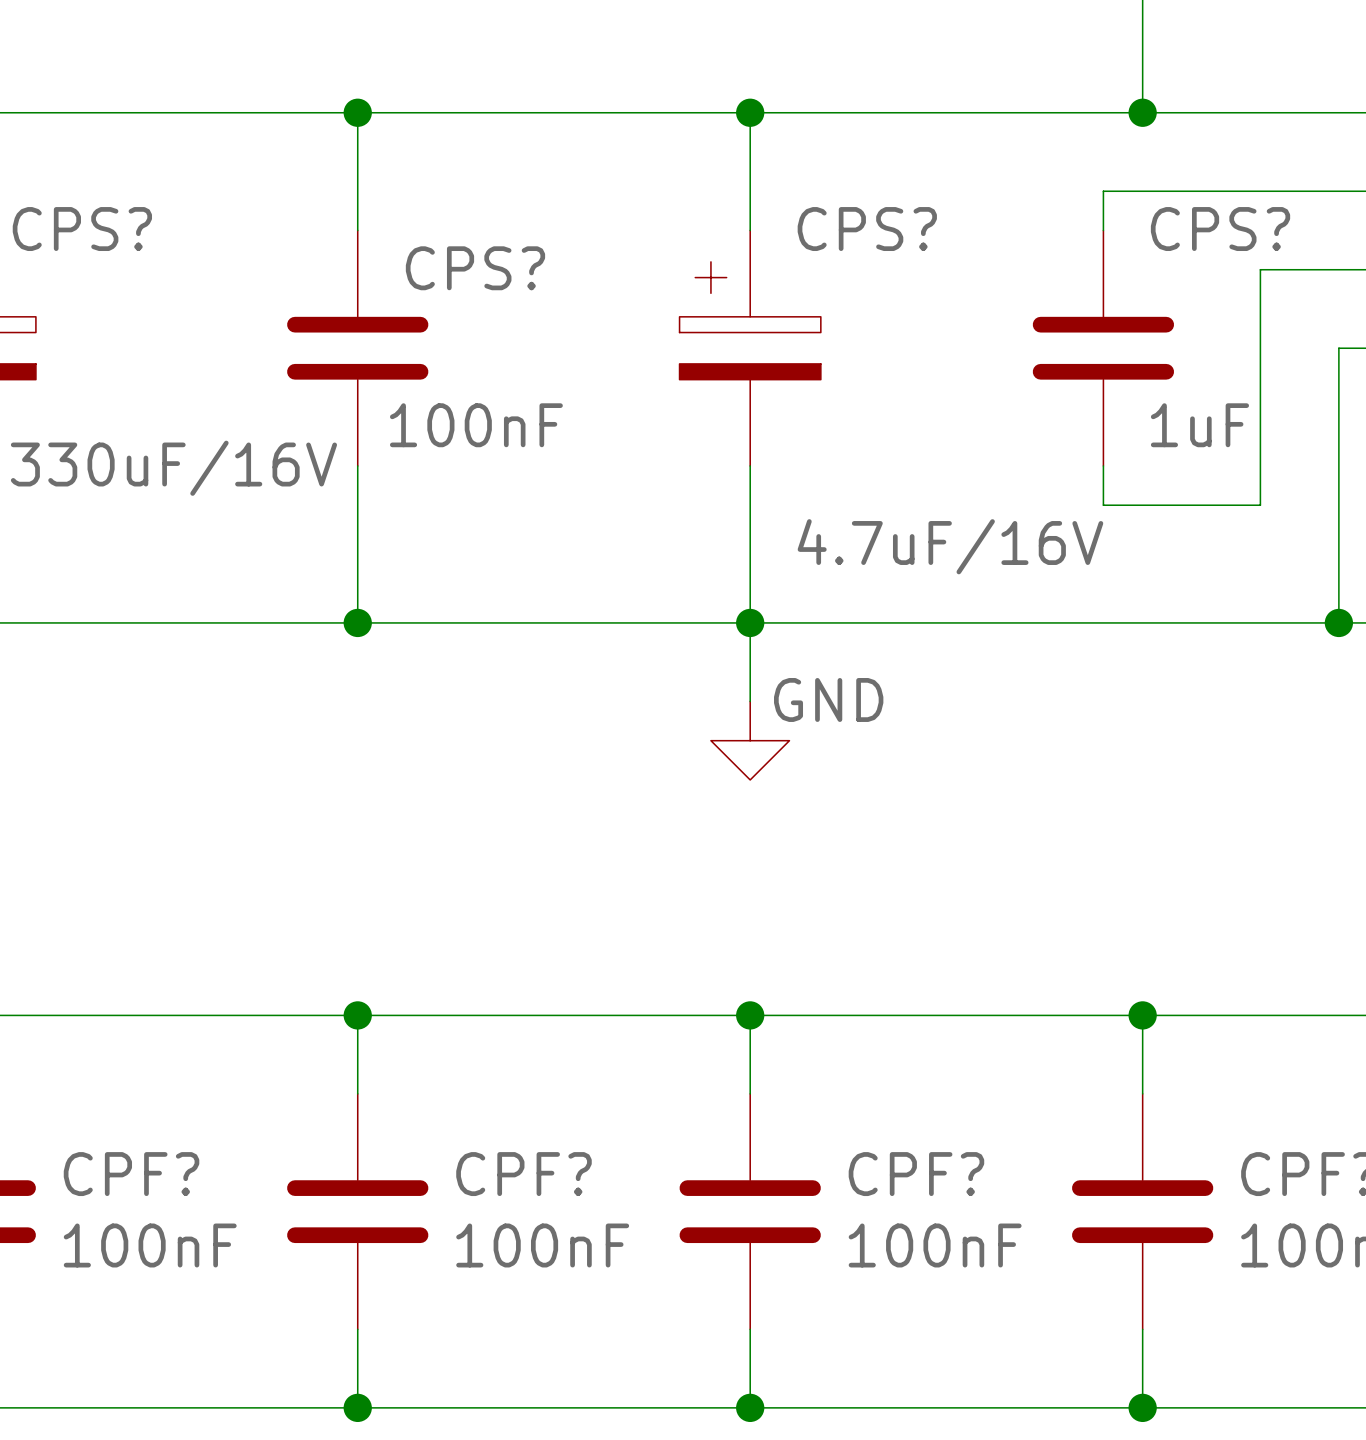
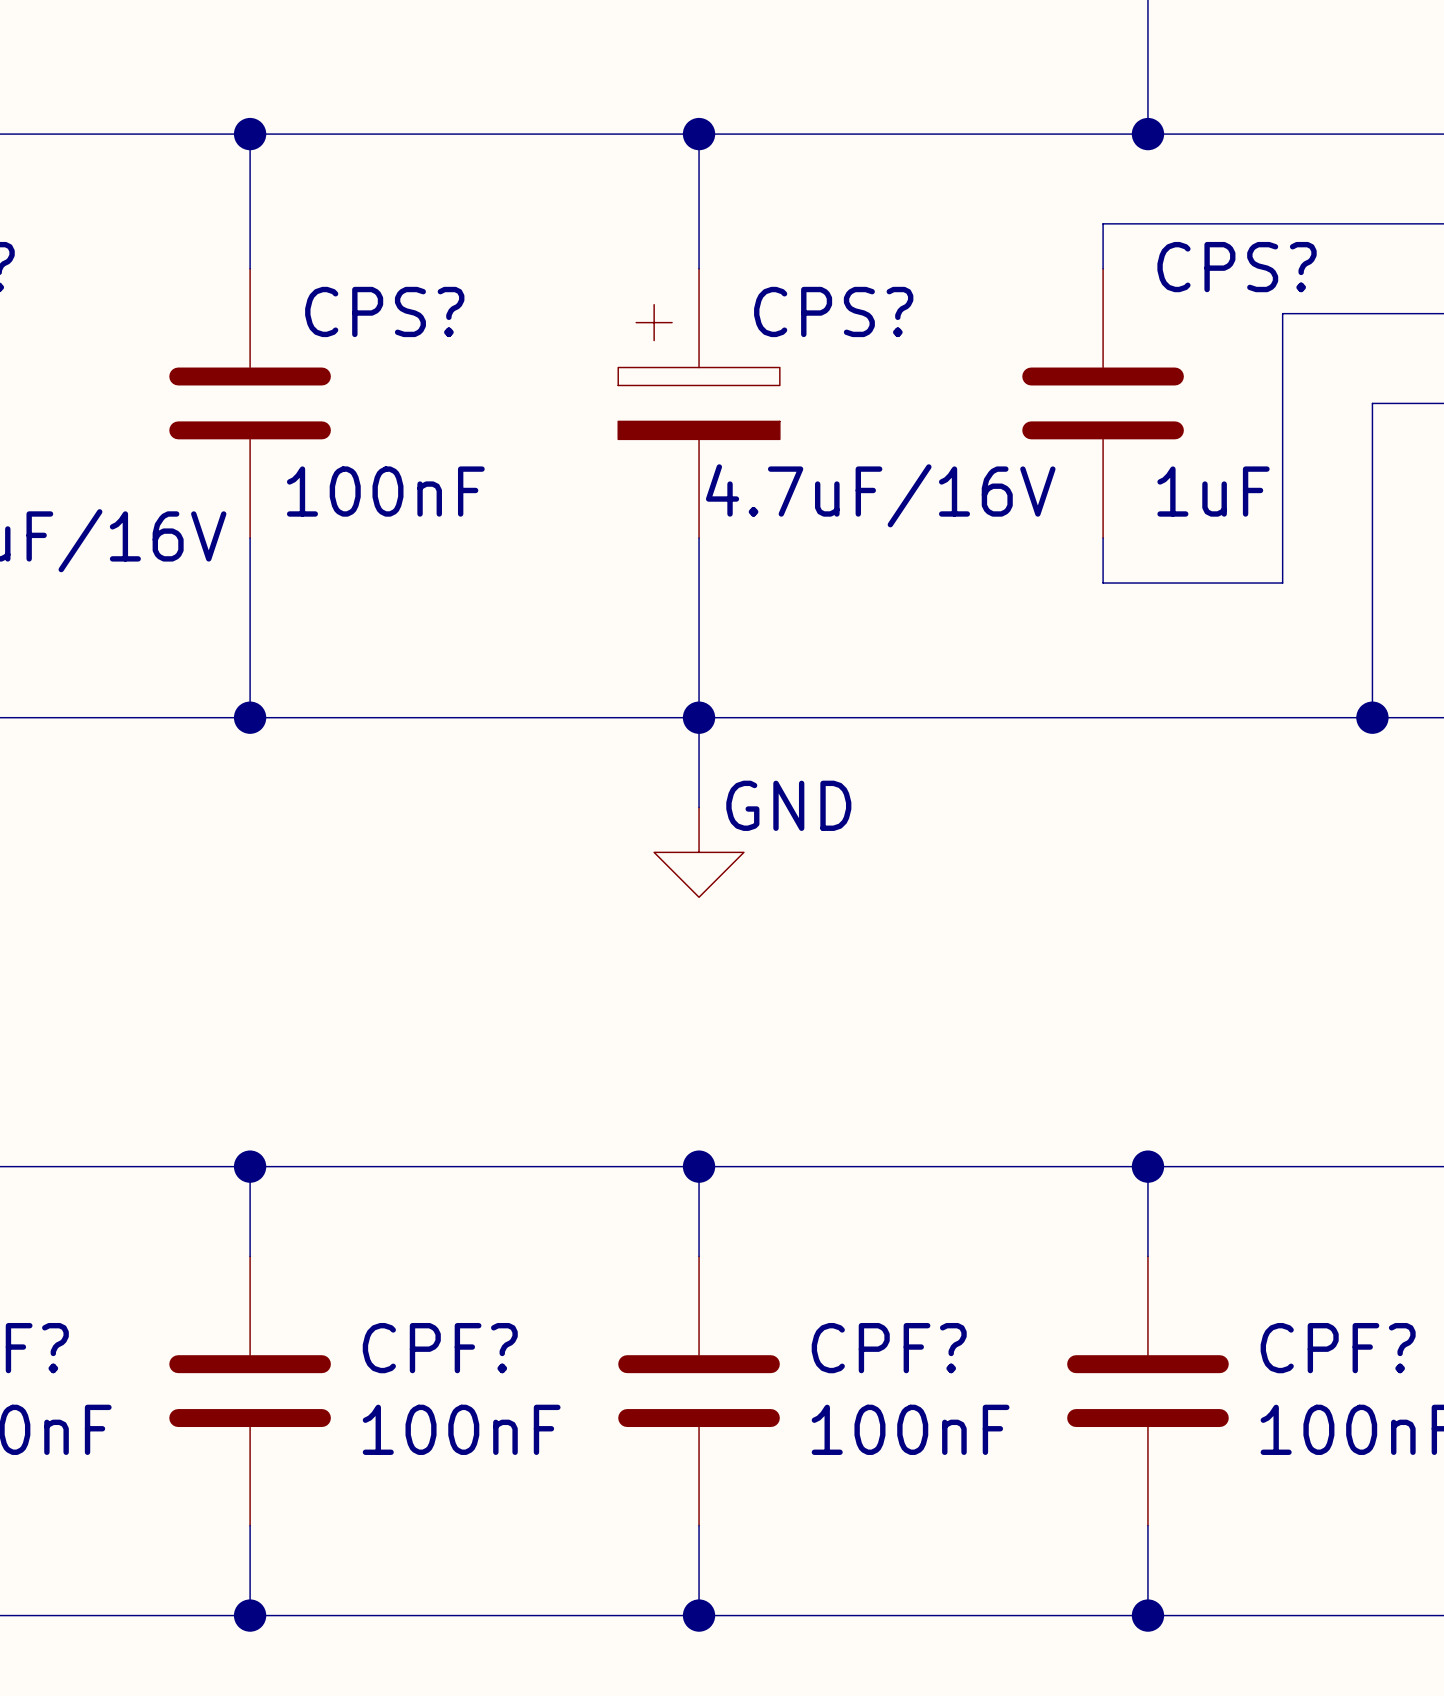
CPS? name position: CPS? (867, 229) -> CPS? (833, 311)
CPS? value position: 4.7uF/16V (950, 546) -> 4.7uF/16V (880, 495)

